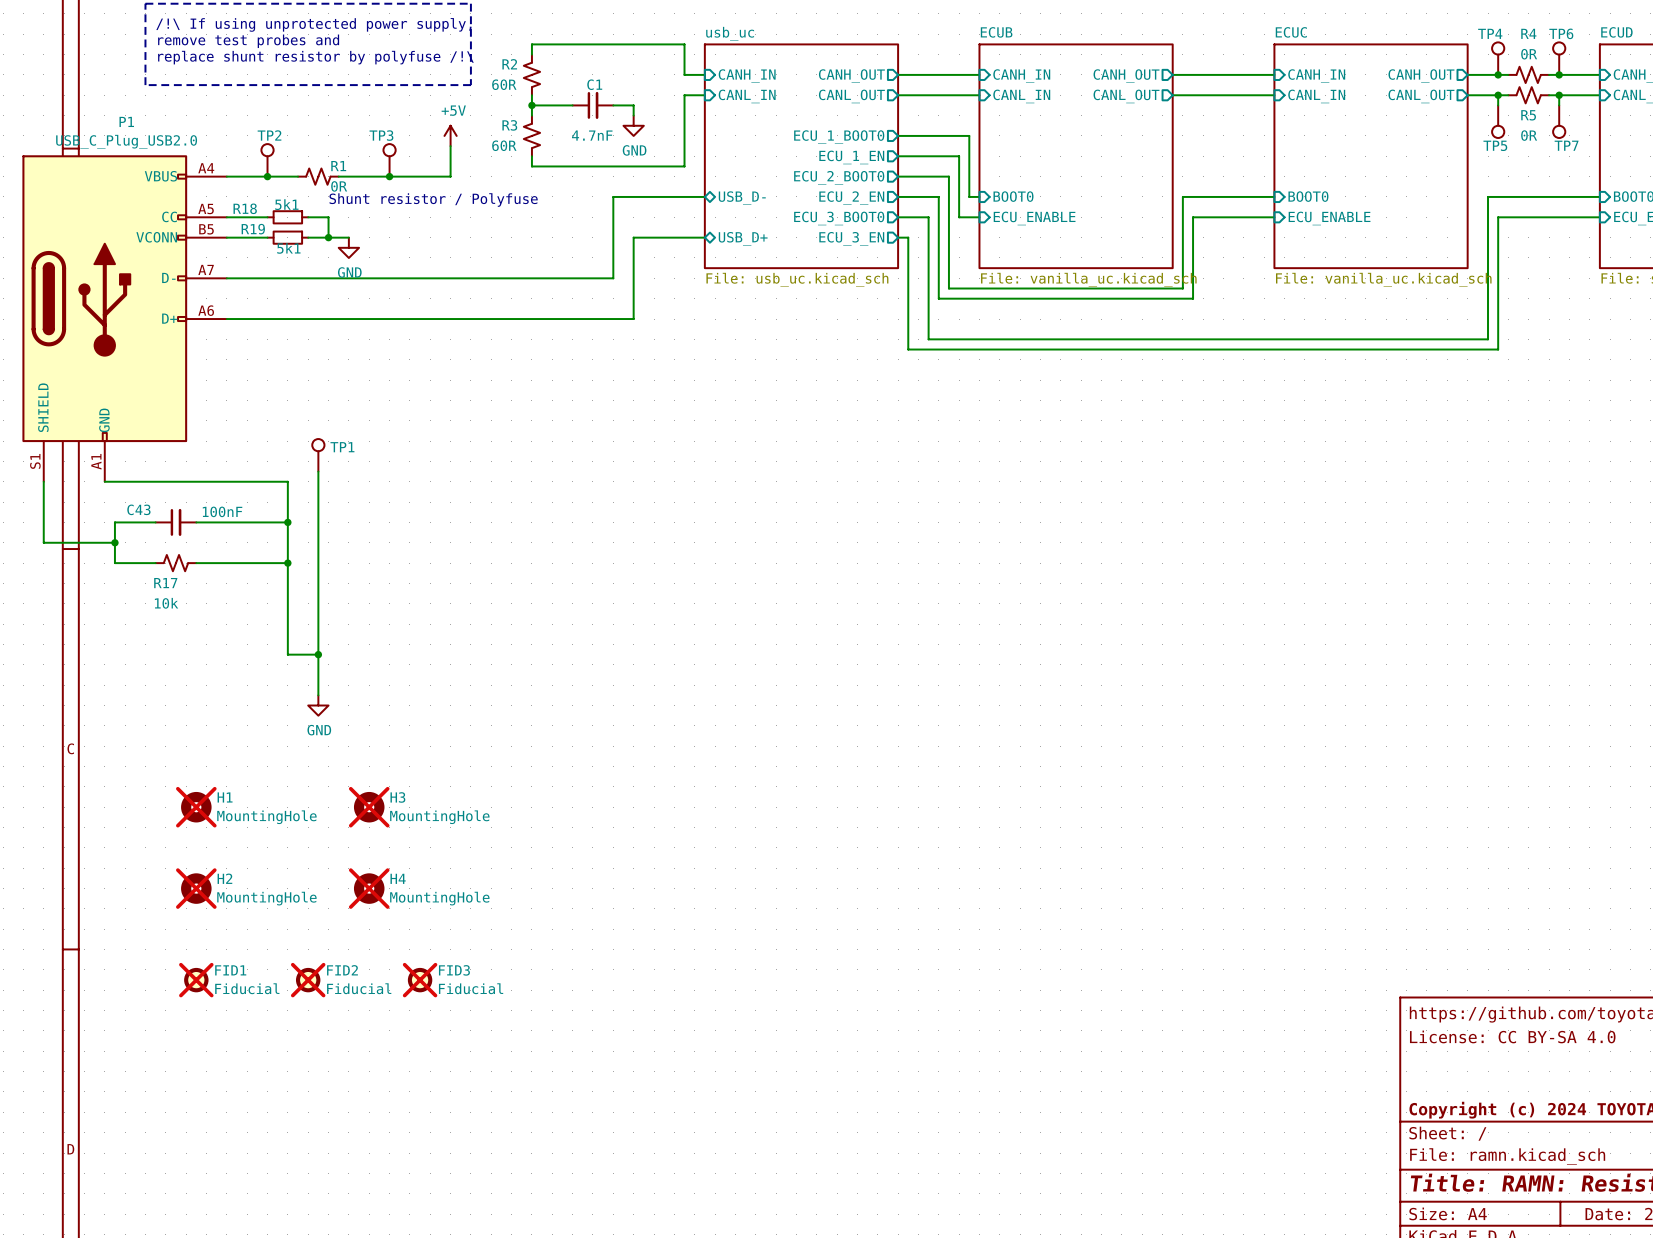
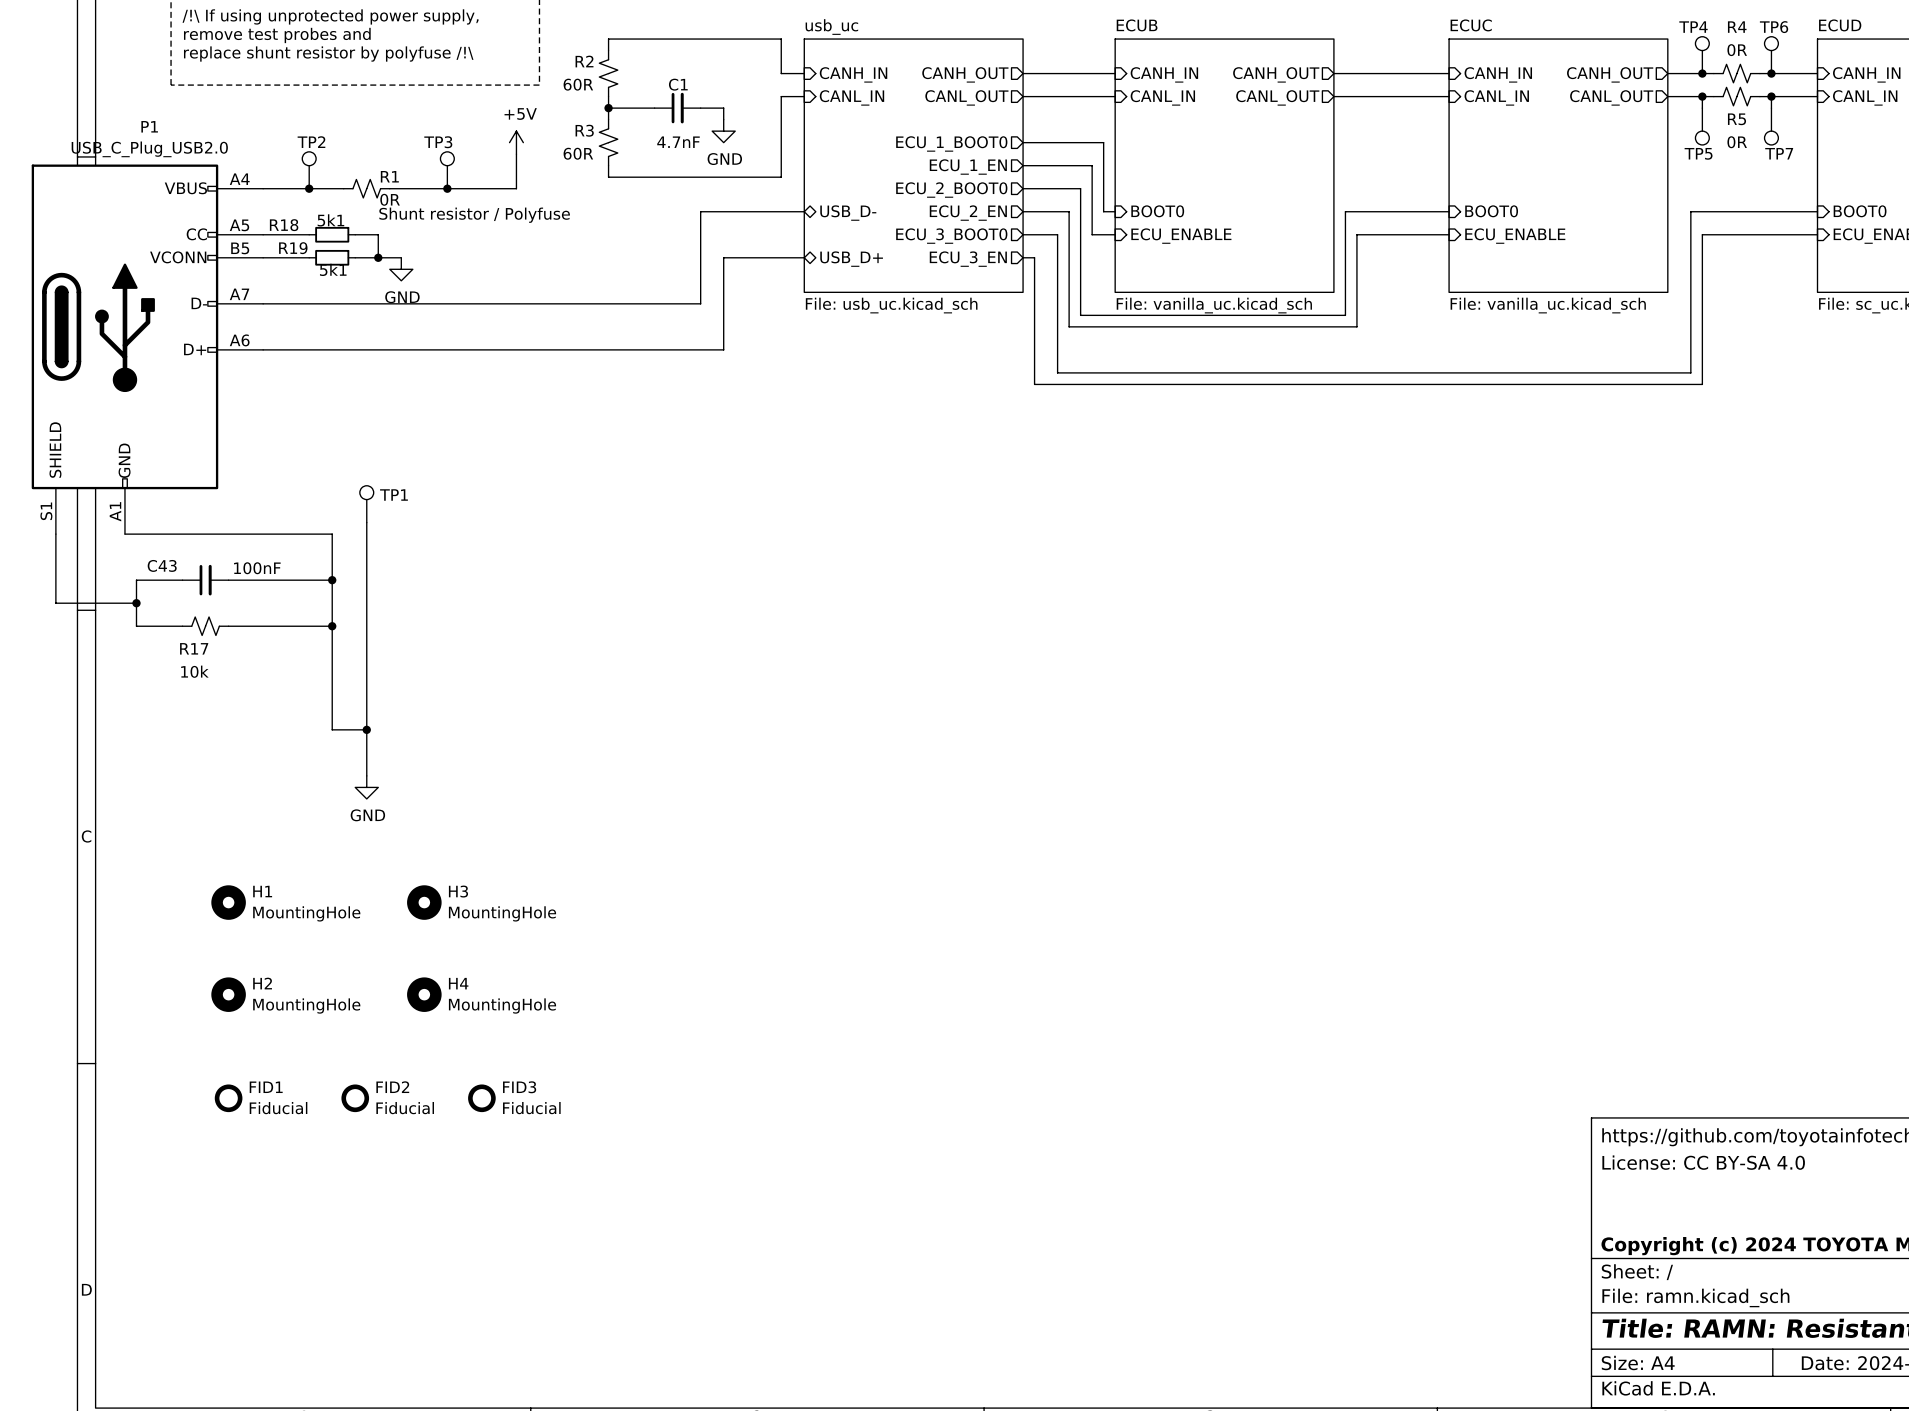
H1 do-not-place cross: (196, 807) -> none
H3 do-not-place cross: (369, 807) -> none
H2 do-not-place cross: (196, 888) -> none
H4 do-not-place cross: (369, 888) -> none
FID1 do-not-place cross: (196, 980) -> none
FID2 do-not-place cross: (308, 980) -> none
FID3 do-not-place cross: (420, 980) -> none

